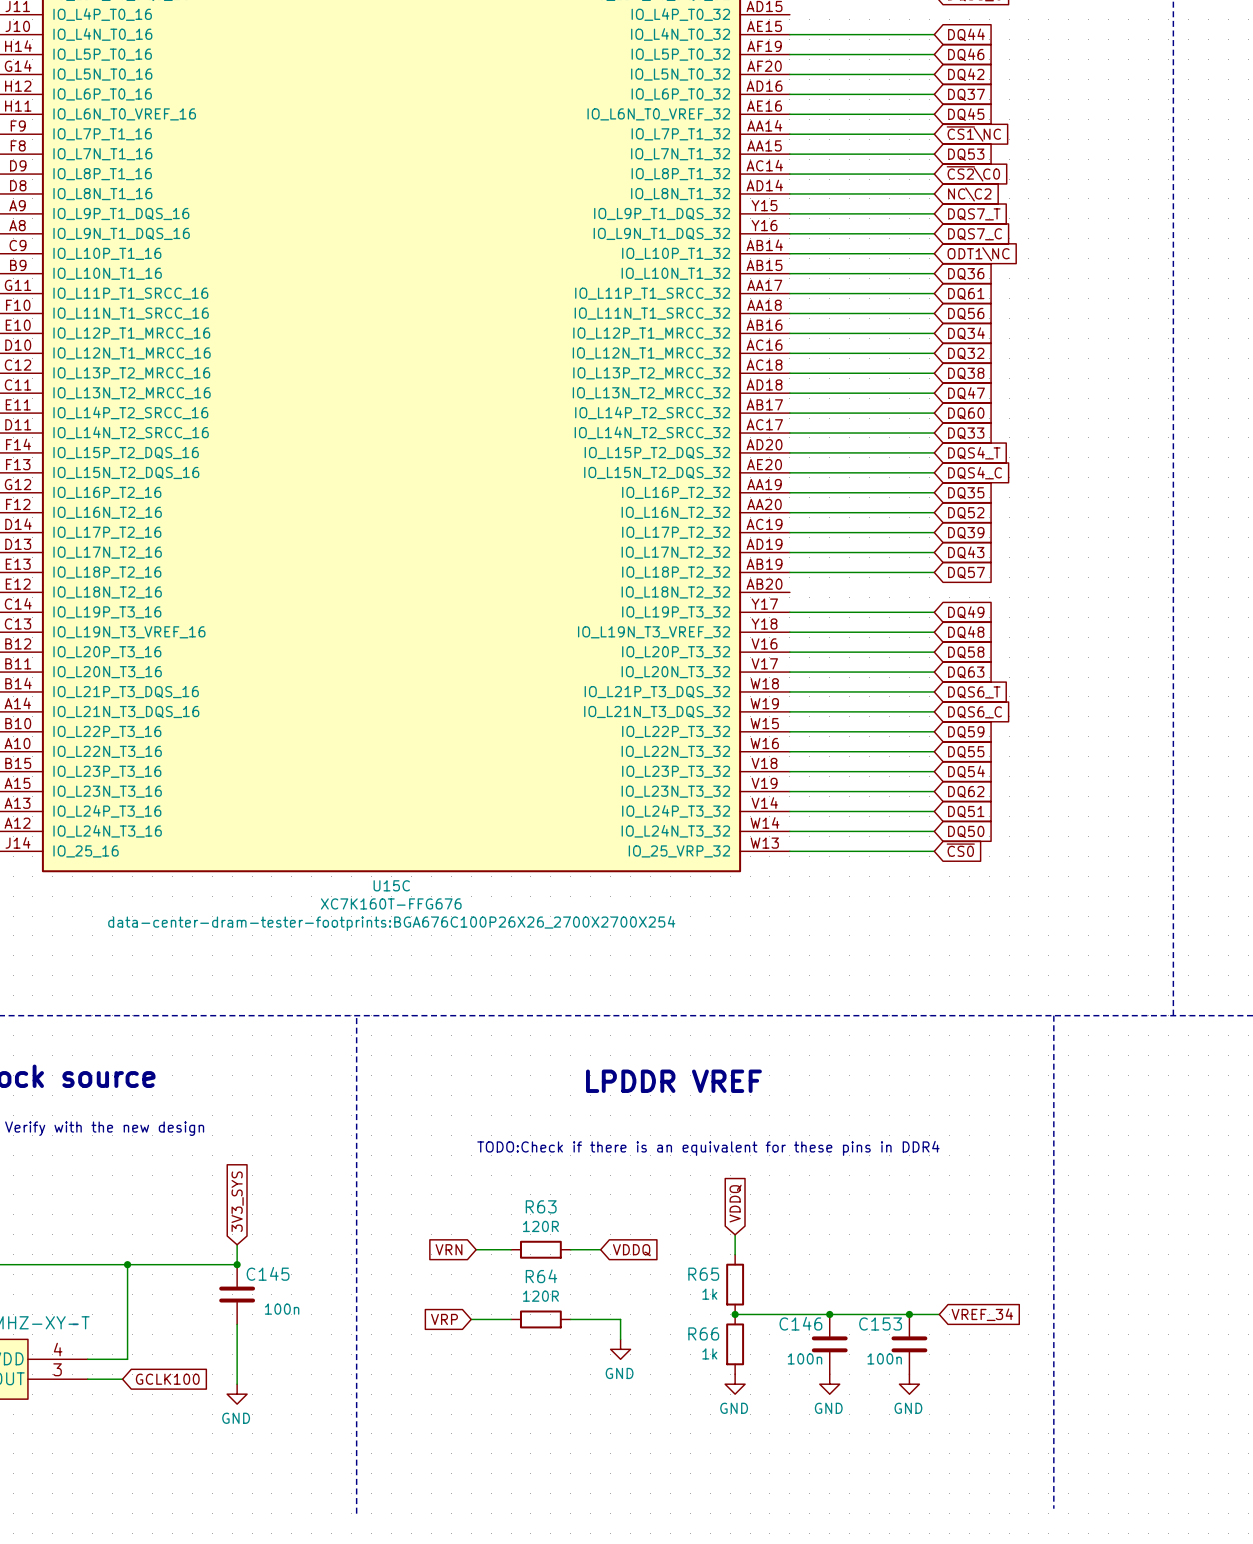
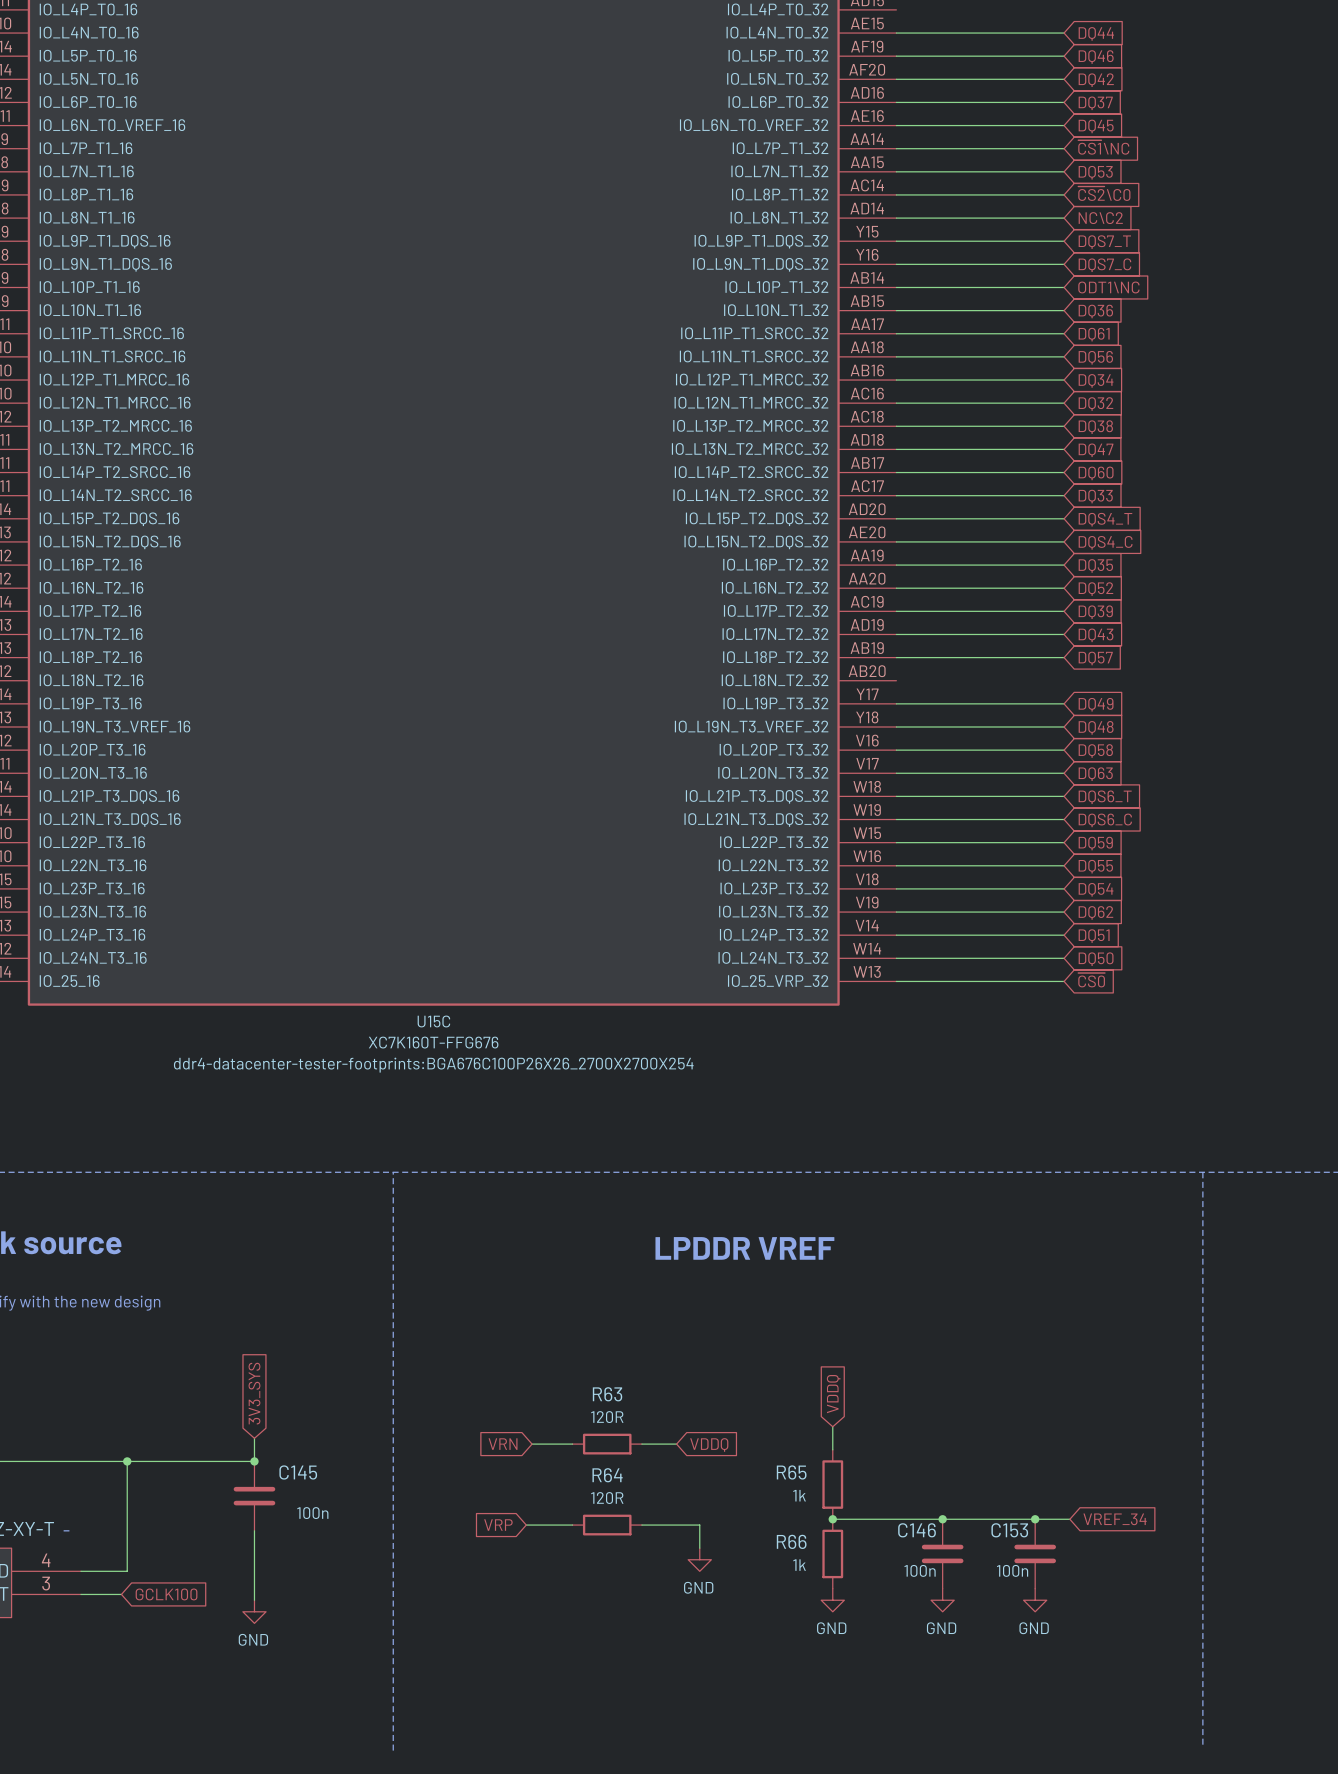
U15C text: data-center-dram-tester-footprints:BGA676C100P26X26_2700X2700X254 (391, 923) -> ddr4-datacenter-tester-footprints:BGA676C100P26X26_2700X2700X254 (433, 1065)
text: TODO:Check if there is an equivalent for these pins in DDR4 (708, 1148) -> none

